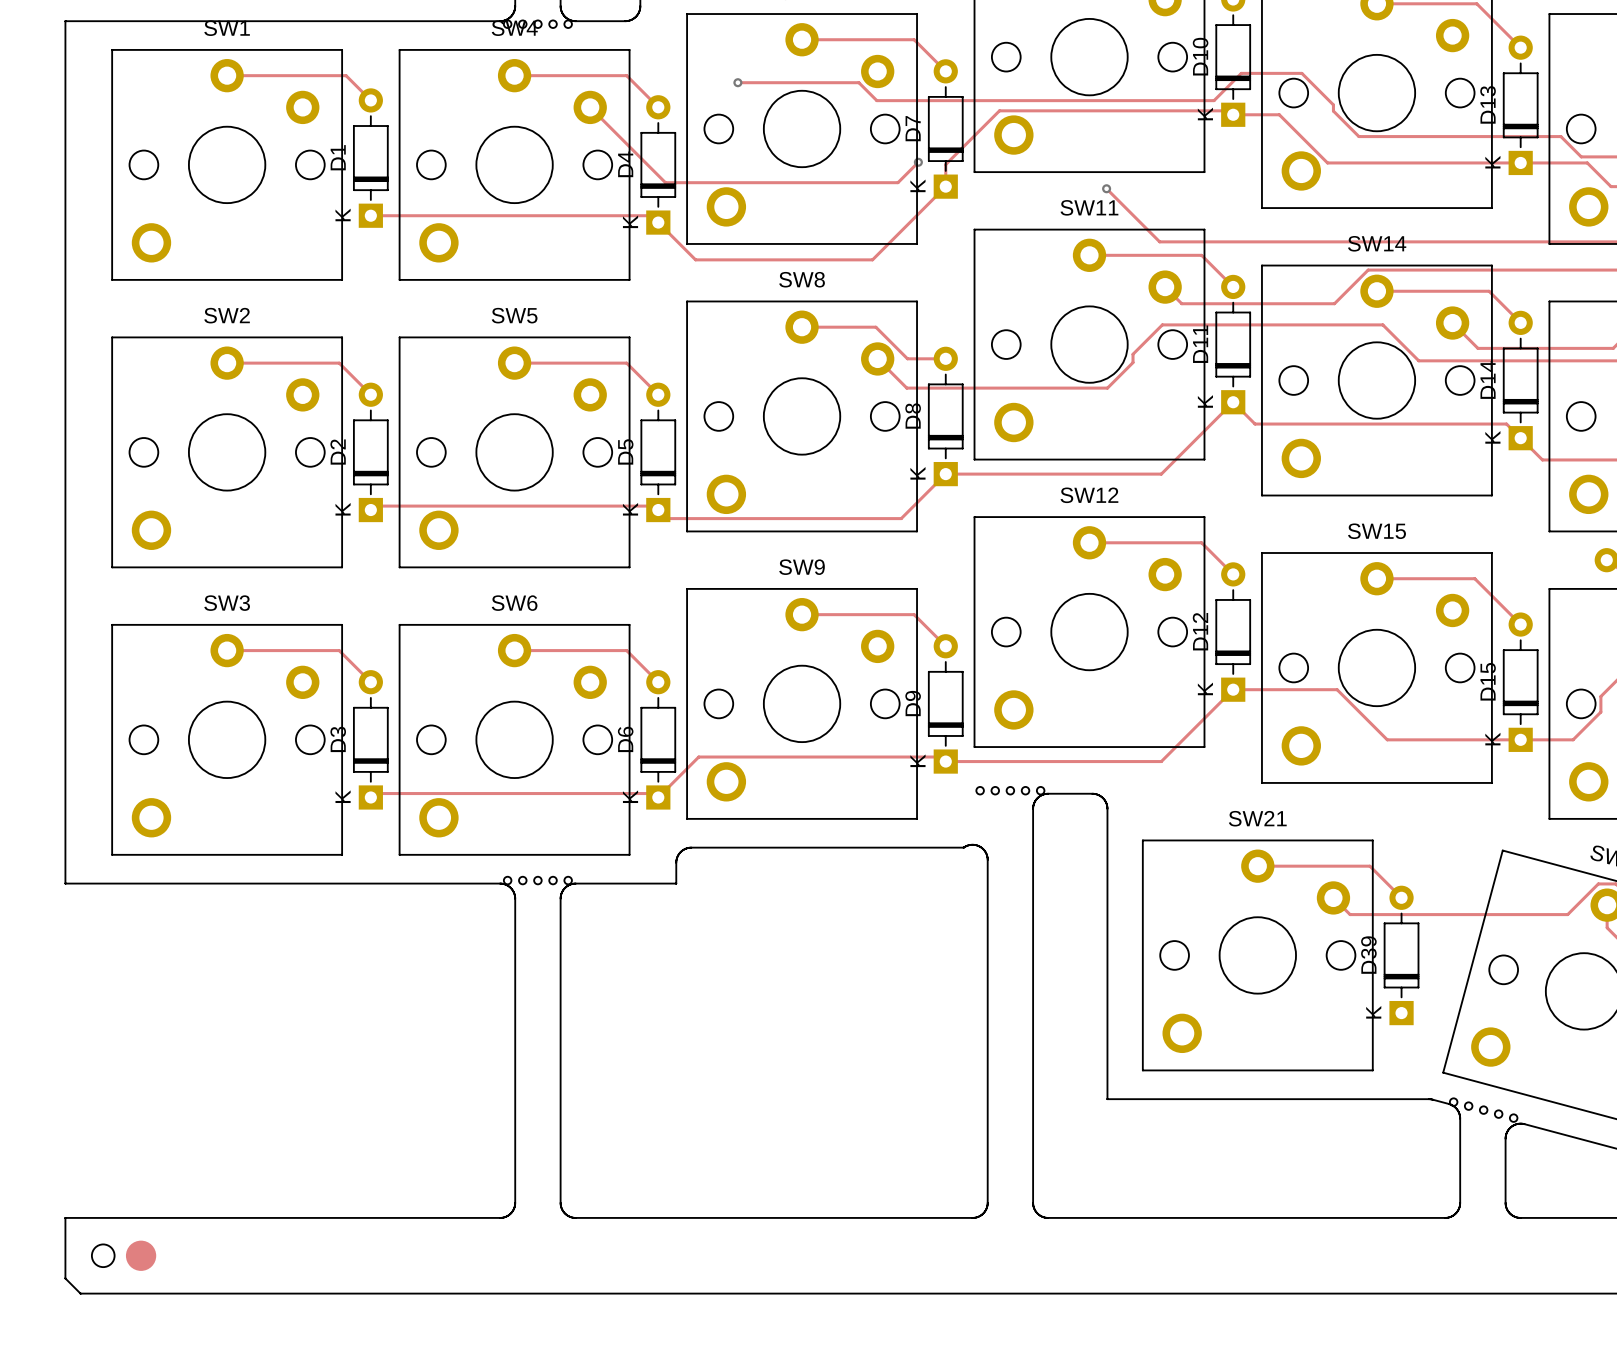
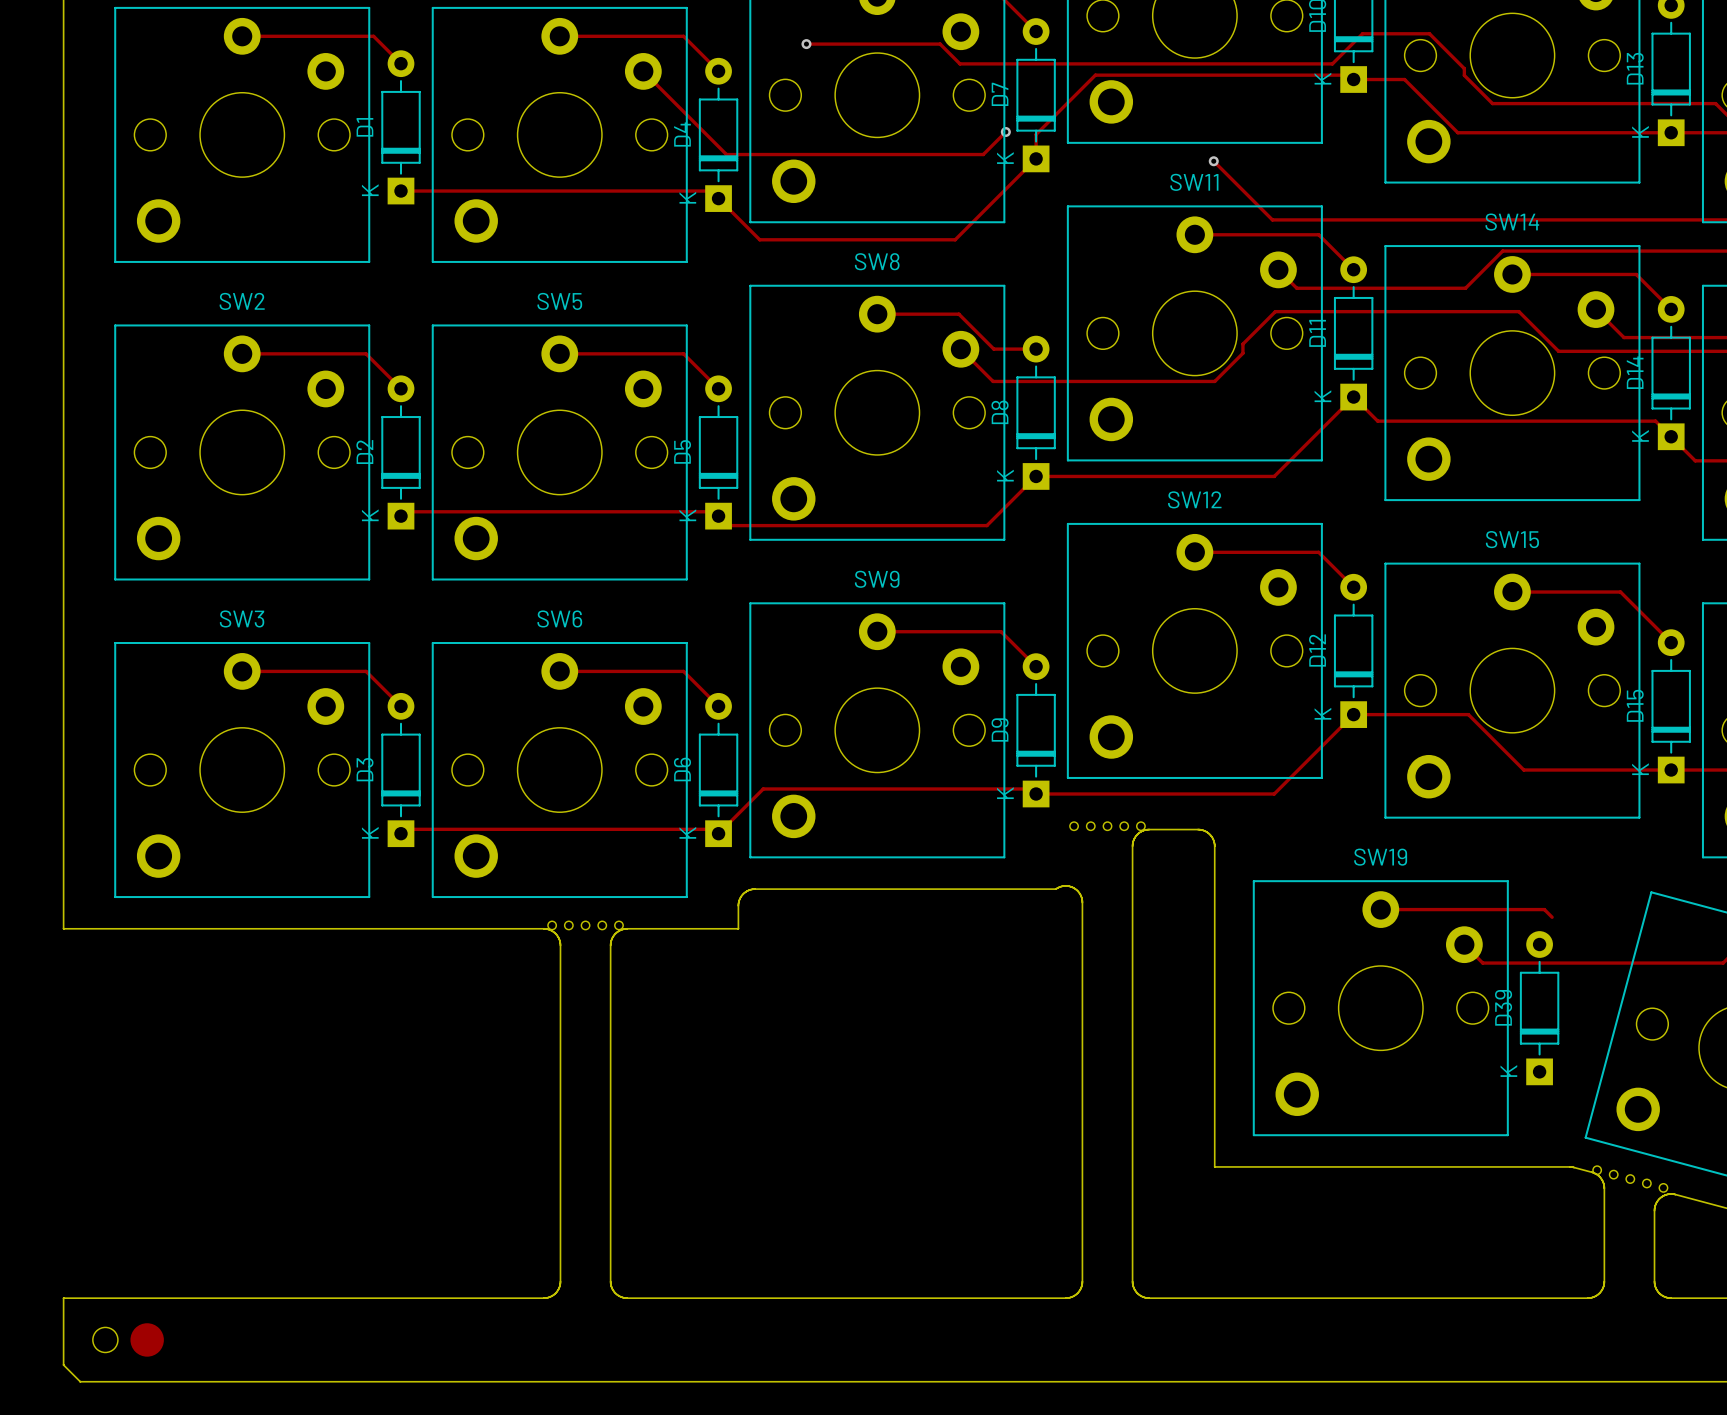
SW21 name: SW21 (1257, 818) -> SW19 (1380, 857)
track: (1369, 866) (1401, 897) -> (1504, 909) (1544, 909) (1552, 917)

